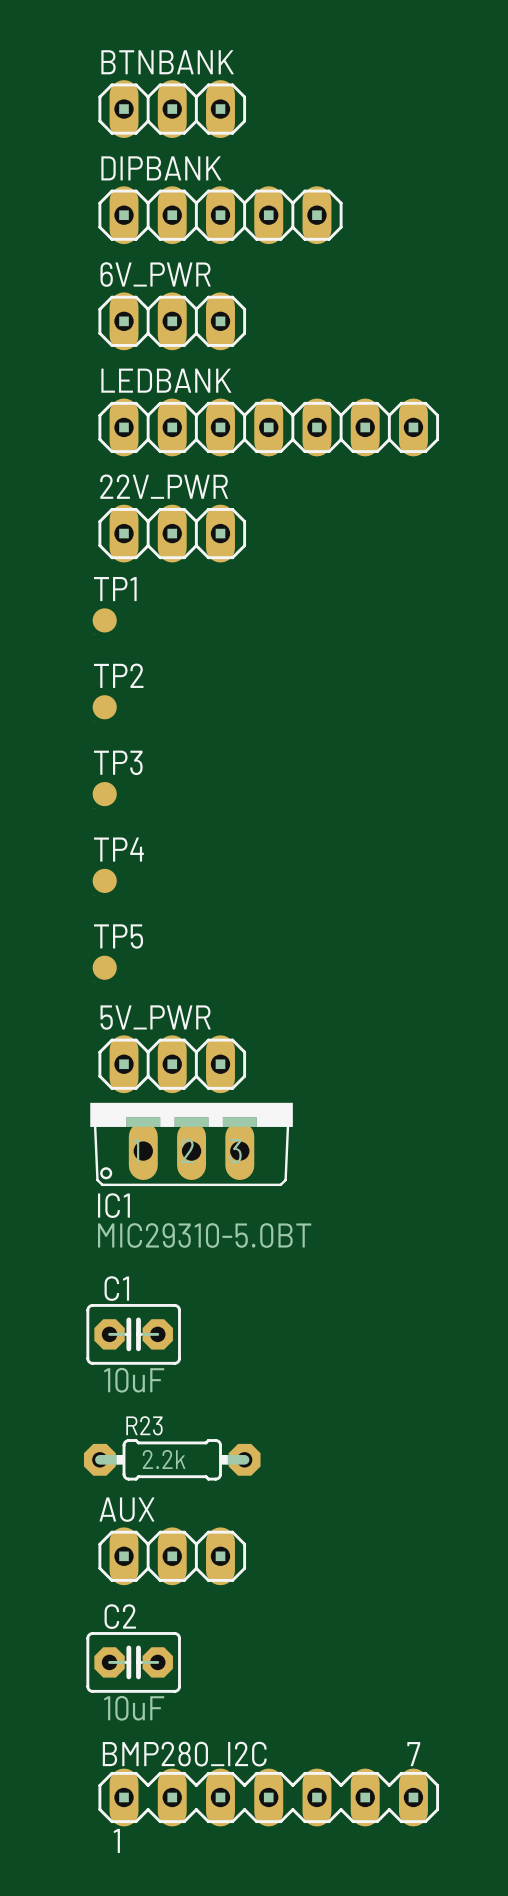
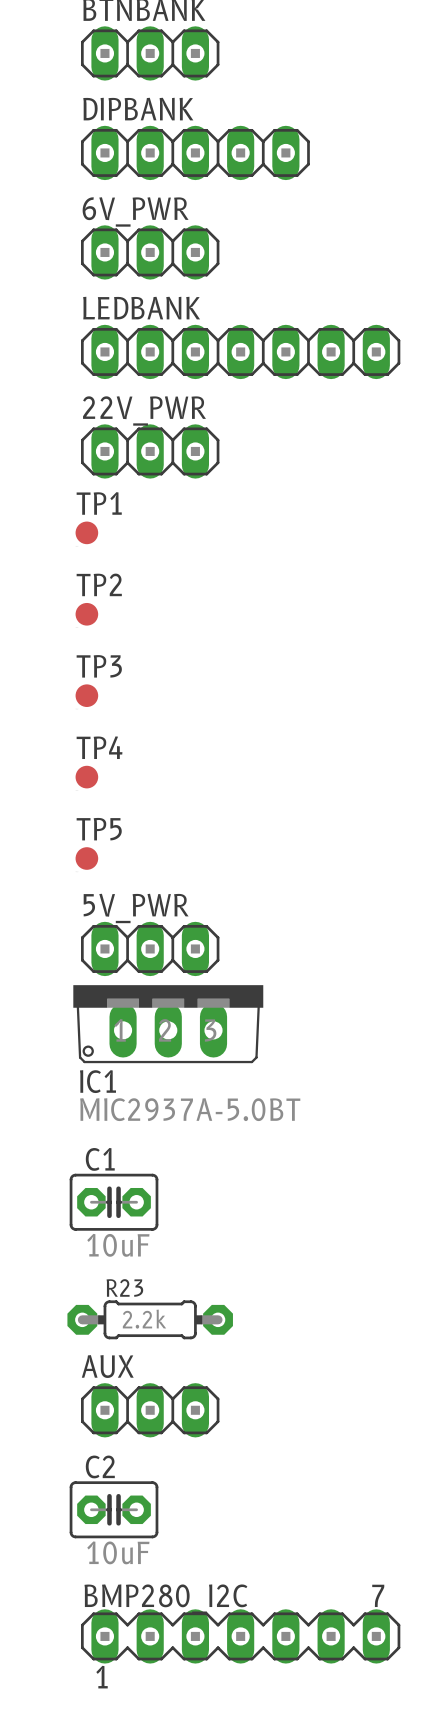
IC1 value: MIC29310-5.0BT (204, 1235) -> MIC2937A-5.0BT (190, 1109)

